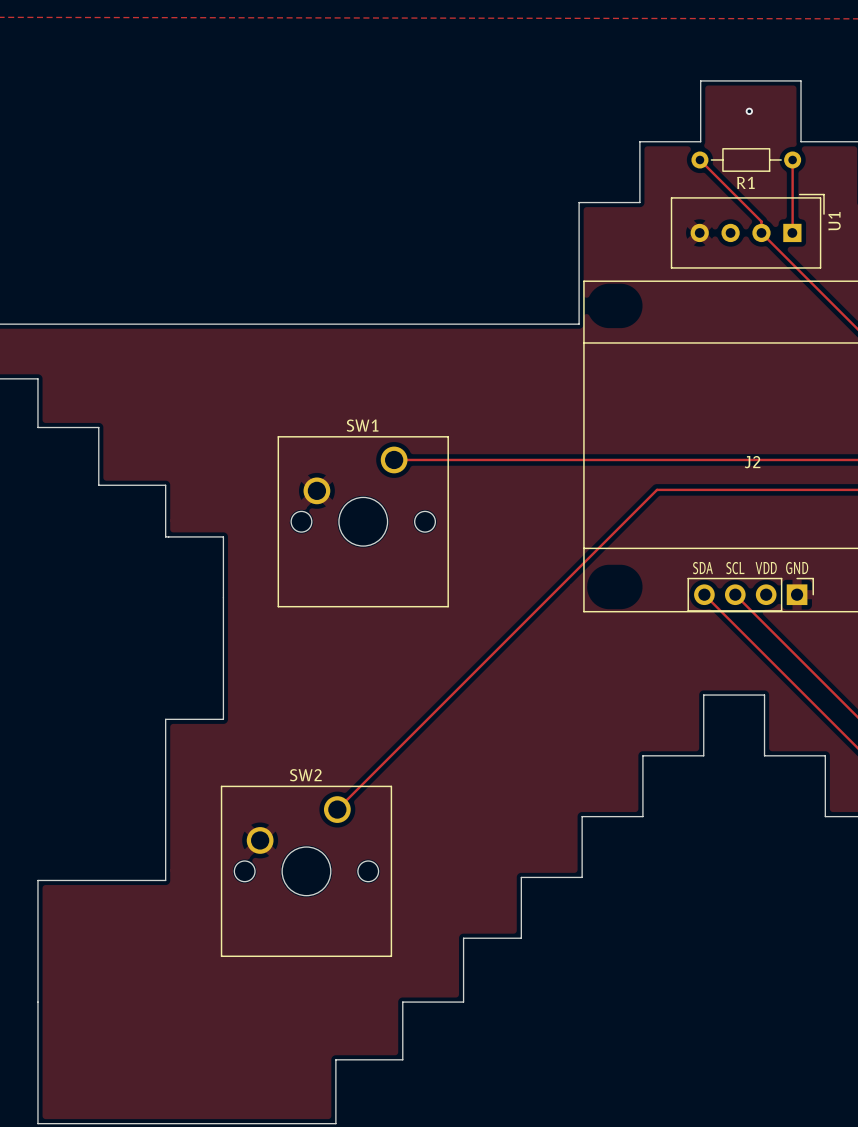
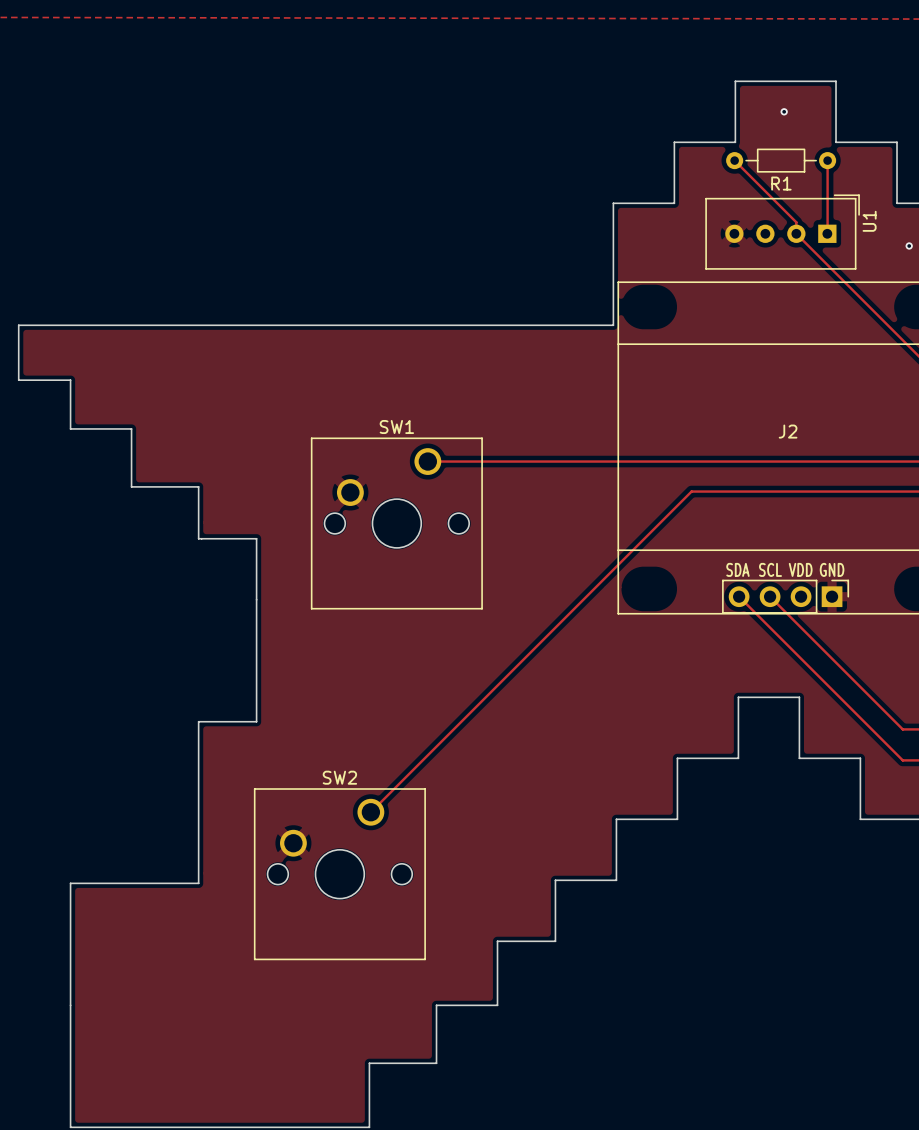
J2 name position: J2 (752, 462) -> J2 (788, 431)

